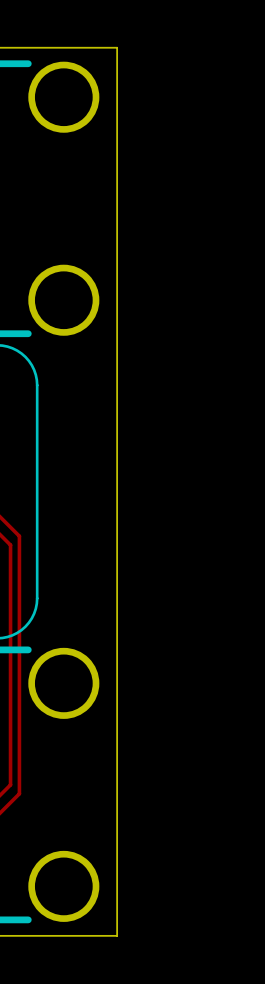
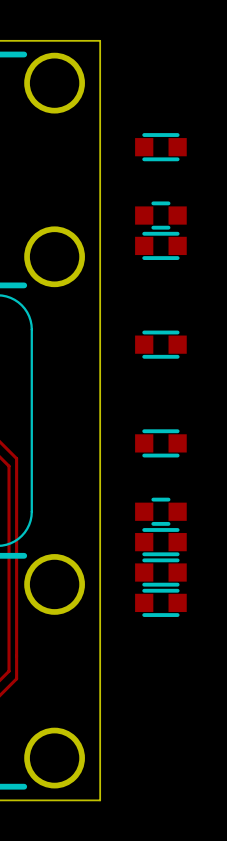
part: none -> (160, 147)
part: none -> (160, 215)
part: none -> (160, 245)
part: none -> (160, 344)
part: none -> (160, 443)
part: none -> (160, 511)
part: none -> (160, 542)
part: none -> (160, 572)
part: none -> (160, 602)

